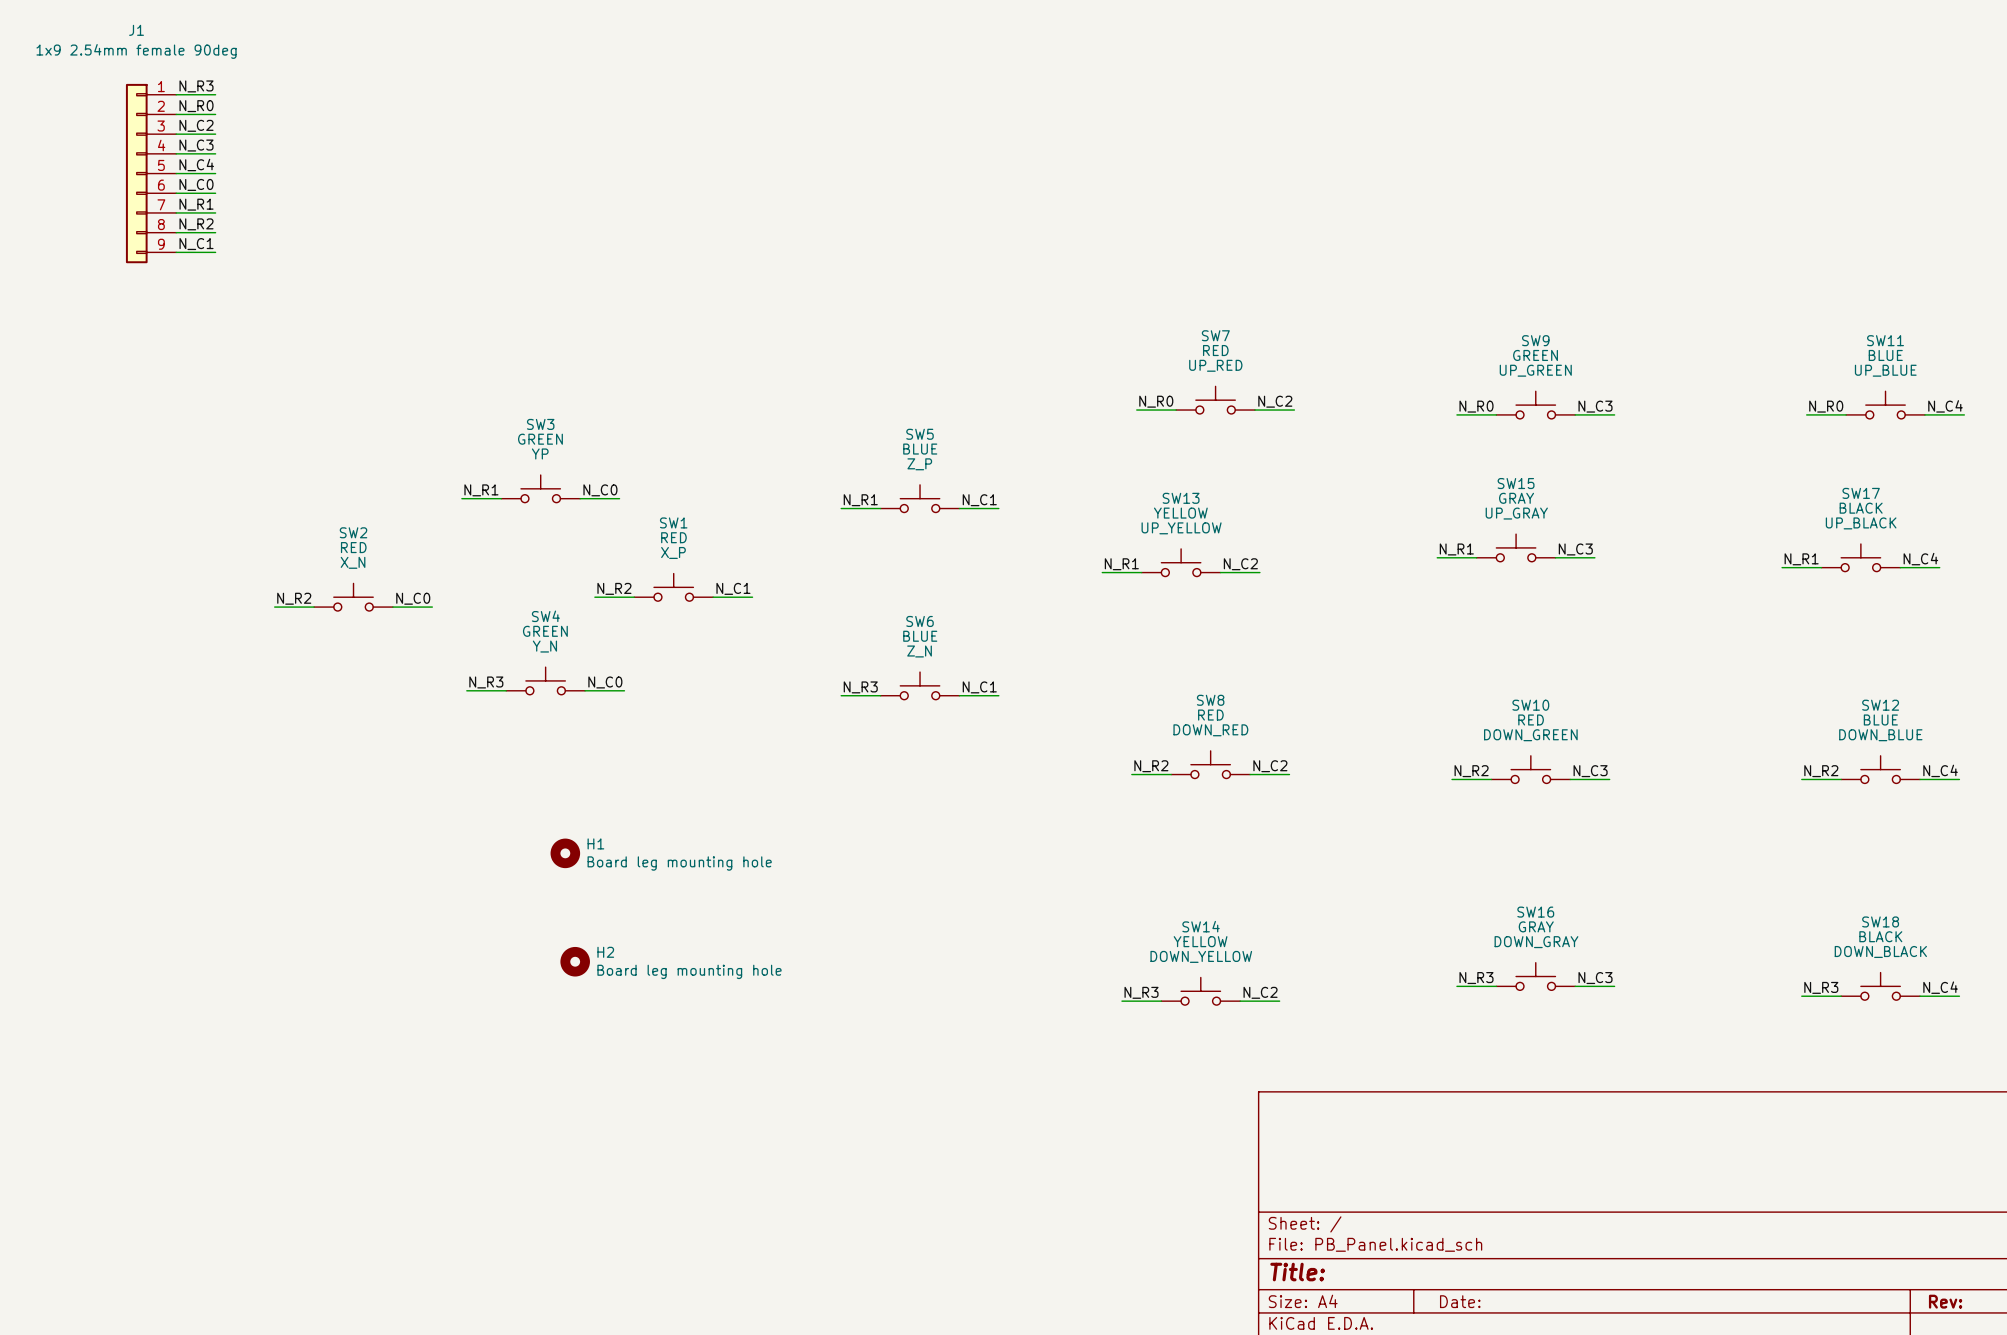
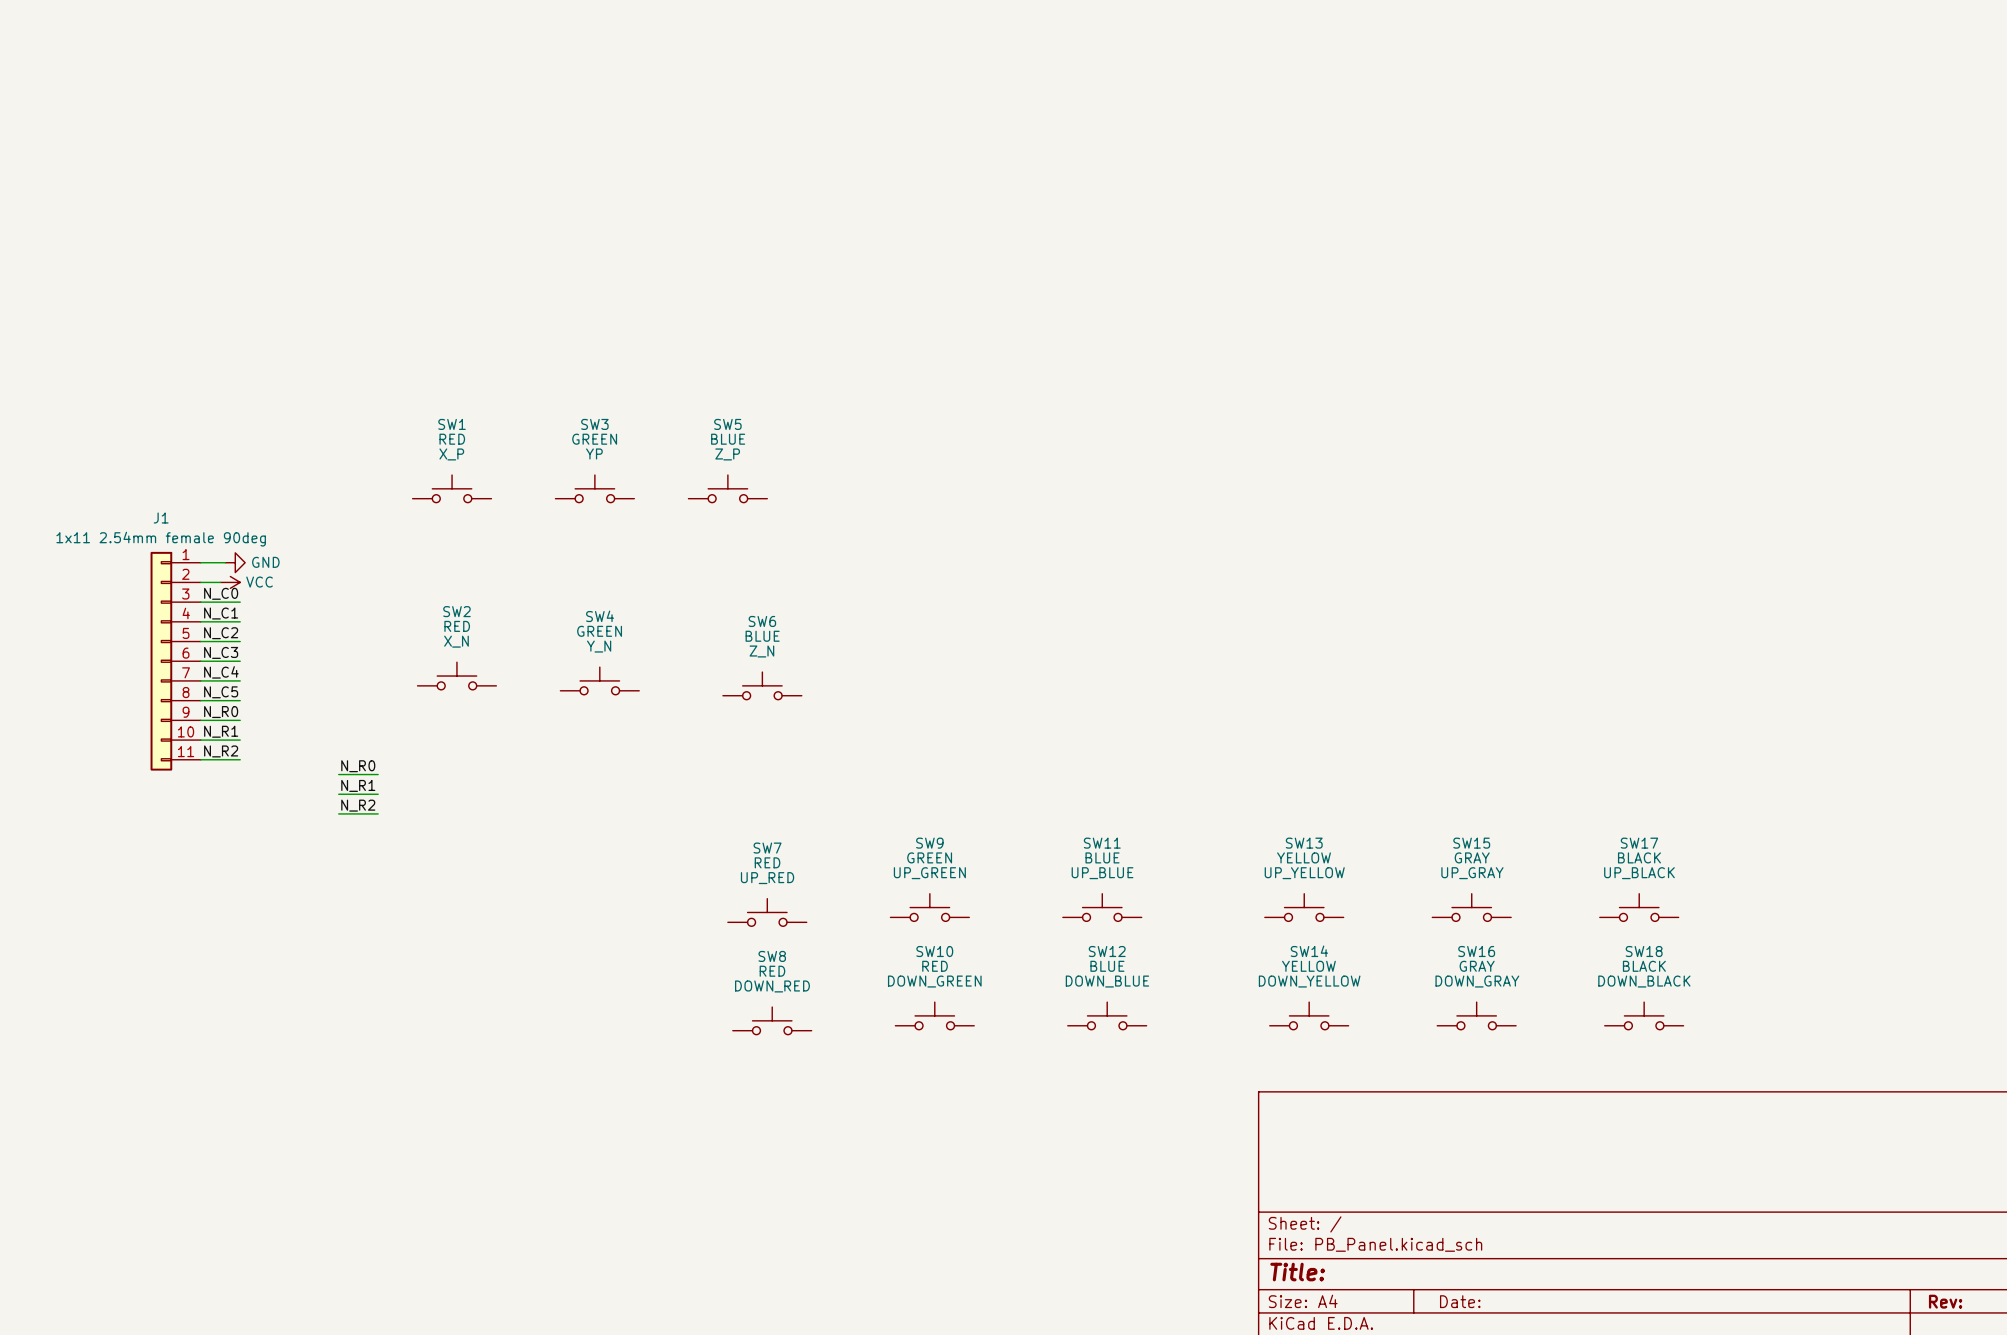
J1 value: 1x9 2.54mm female 90deg (136, 51) -> 1x11 2.54mm female 90deg (161, 539)
J1 symbol: [125, 83, 177, 264] -> [150, 551, 201, 771]
label: N_R3 (196, 86) -> none
wire: (176, 94) (215, 94) -> none
label: N_R0 (196, 106) -> none
wire: (176, 114) (215, 114) -> none
label: N_C2 (196, 125) -> none
wire: (176, 134) (215, 134) -> none
label: N_C3 (196, 145) -> none
wire: (176, 153) (215, 153) -> none
label: N_C4 (196, 165) -> none
wire: (176, 173) (215, 173) -> none
label: N_C0 (196, 184) -> none
wire: (176, 193) (215, 193) -> none
label: N_R1 (196, 204) -> none
wire: (176, 212) (215, 212) -> none
label: N_R2 (196, 224) -> none
wire: (176, 232) (215, 232) -> none
label: N_C1 (196, 244) -> none
wire: (176, 252) (215, 252) -> none
SW7 position: (1215, 400) -> (767, 912)
label: N_R0 (1156, 401) -> none
label: N_C2 (1275, 401) -> none
SW9 position: (1535, 405) -> (929, 907)
SW11 position: (1885, 405) -> (1102, 907)
label: N_R0 (1476, 406) -> none
label: N_C3 (1595, 406) -> none
label: N_R0 (1826, 406) -> none
label: N_C4 (1945, 406) -> none
wire: (1136, 410) (1176, 410) -> none
wire: (1254, 410) (1294, 410) -> none
wire: (1456, 414) (1496, 414) -> none
wire: (1575, 414) (1614, 414) -> none
wire: (1806, 414) (1846, 414) -> none
wire: (1924, 414) (1964, 414) -> none
SW3 position: (540, 488) -> (594, 488)
label: N_R1 (481, 490) -> none
label: N_C0 (600, 490) -> none
wire: (580, 498) (619, 498) -> none
SW5 position: (920, 498) -> (727, 488)
label: N_R1 (860, 500) -> none
label: N_C1 (979, 500) -> none
wire: (841, 508) (880, 508) -> none
wire: (959, 508) (998, 508) -> none
SW15 position: (1516, 547) -> (1471, 907)
label: N_R1 (1456, 549) -> none
label: N_C3 (1575, 549) -> none
wire: (1437, 557) (1476, 557) -> none
wire: (1555, 557) (1594, 557) -> none
SW17 position: (1860, 557) -> (1639, 907)
label: N_R1 (1801, 559) -> none
label: N_C4 (1920, 559) -> none
wire: none -> (200, 562) (225, 562)
power symbol: none -> GND (235, 562)
SW13 position: (1181, 562) -> (1304, 907)
label: N_R1 (1121, 564) -> none
label: N_C2 (1240, 564) -> none
wire: (1782, 567) (1821, 567) -> none
wire: (1900, 567) (1939, 567) -> none
wire: (1102, 572) (1141, 572) -> none
wire: (1220, 572) (1259, 572) -> none
wire: none -> (200, 582) (220, 582)
power symbol: none -> VCC (230, 582)
SW1 position: (673, 587) -> (452, 488)
label: N_R2 (614, 588) -> none
label: N_C1 (733, 588) -> none
SW2 position: (353, 597) -> (456, 676)
wire: (594, 597) (634, 597) -> none
wire: (713, 597) (752, 597) -> none
label: N_R2 (294, 598) -> none
label position: N_C0 (413, 598) -> N_C0 (221, 593)
wire: (274, 607) (314, 607) -> (200, 602) (240, 602)
wire: (392, 607) (432, 607) -> (200, 621) (240, 621)
label: none -> N_C1 (221, 613)
label: none -> N_C2 (221, 633)
wire: none -> (200, 641) (240, 641)
label: none -> N_C3 (221, 652)
wire: none -> (200, 661) (240, 661)
label: none -> N_C4 (221, 672)
wire: none -> (200, 680) (240, 680)
SW4 position: (545, 680) -> (599, 680)
label: N_R3 (486, 682) -> none
label: N_C0 (605, 682) -> none
SW6 position: (920, 685) -> (762, 685)
label: N_R3 (860, 687) -> none
label: N_C1 (979, 687) -> none
wire: (466, 690) (506, 690) -> (338, 774) (378, 774)
wire: (585, 690) (624, 690) -> none
label: none -> N_C5 (221, 692)
wire: (841, 695) (880, 695) -> none
wire: (959, 695) (998, 695) -> none
wire: none -> (200, 700) (240, 700)
label: none -> N_R0 (221, 712)
wire: none -> (200, 720) (240, 720)
label: none -> N_R1 (221, 731)
wire: none -> (200, 740) (240, 740)
label: none -> N_R2 (221, 751)
wire: none -> (200, 759) (240, 759)
SW8 position: (1210, 764) -> (772, 1020)
label: none -> N_R0 (358, 766)
label: N_R2 (1151, 766) -> none
label: N_C2 (1270, 766) -> none
SW10 position: (1530, 769) -> (934, 1015)
SW12 position: (1880, 769) -> (1107, 1015)
label: N_C4 (1940, 770) -> none
label: N_R2 (1471, 771) -> none
label: N_C3 (1590, 771) -> none
label: N_R2 (1821, 771) -> none
wire: (1131, 774) (1171, 774) -> none
wire: (1250, 774) (1289, 774) -> none
wire: (1452, 779) (1491, 779) -> none
wire: (1570, 779) (1609, 779) -> none
wire: (1801, 779) (1841, 779) -> none
wire: (1920, 779) (1959, 779) -> none
label: none -> N_R1 (358, 785)
wire: none -> (338, 794) (378, 794)
label: none -> N_R2 (358, 805)
wire: none -> (338, 813) (378, 813)
H1: Board leg mounting hole (565, 853) -> none
H2: Board leg mounting hole (575, 961) -> none
SW16 position: (1535, 976) -> (1476, 1015)
label: N_R3 (1476, 978) -> none
label: N_C3 (1595, 978) -> none
wire: (1456, 986) (1496, 986) -> none
wire: (1575, 986) (1614, 986) -> none
SW18 position: (1880, 986) -> (1644, 1015)
label: N_R3 (1821, 987) -> none
label: N_C4 (1940, 987) -> none
SW14 position: (1200, 991) -> (1309, 1015)
label: N_R3 (1141, 992) -> none
label: N_C2 (1260, 992) -> none
wire: (1801, 996) (1841, 996) -> none
wire: (1920, 996) (1959, 996) -> none
wire: (1121, 1001) (1161, 1001) -> none
wire: (1240, 1001) (1279, 1001) -> none

